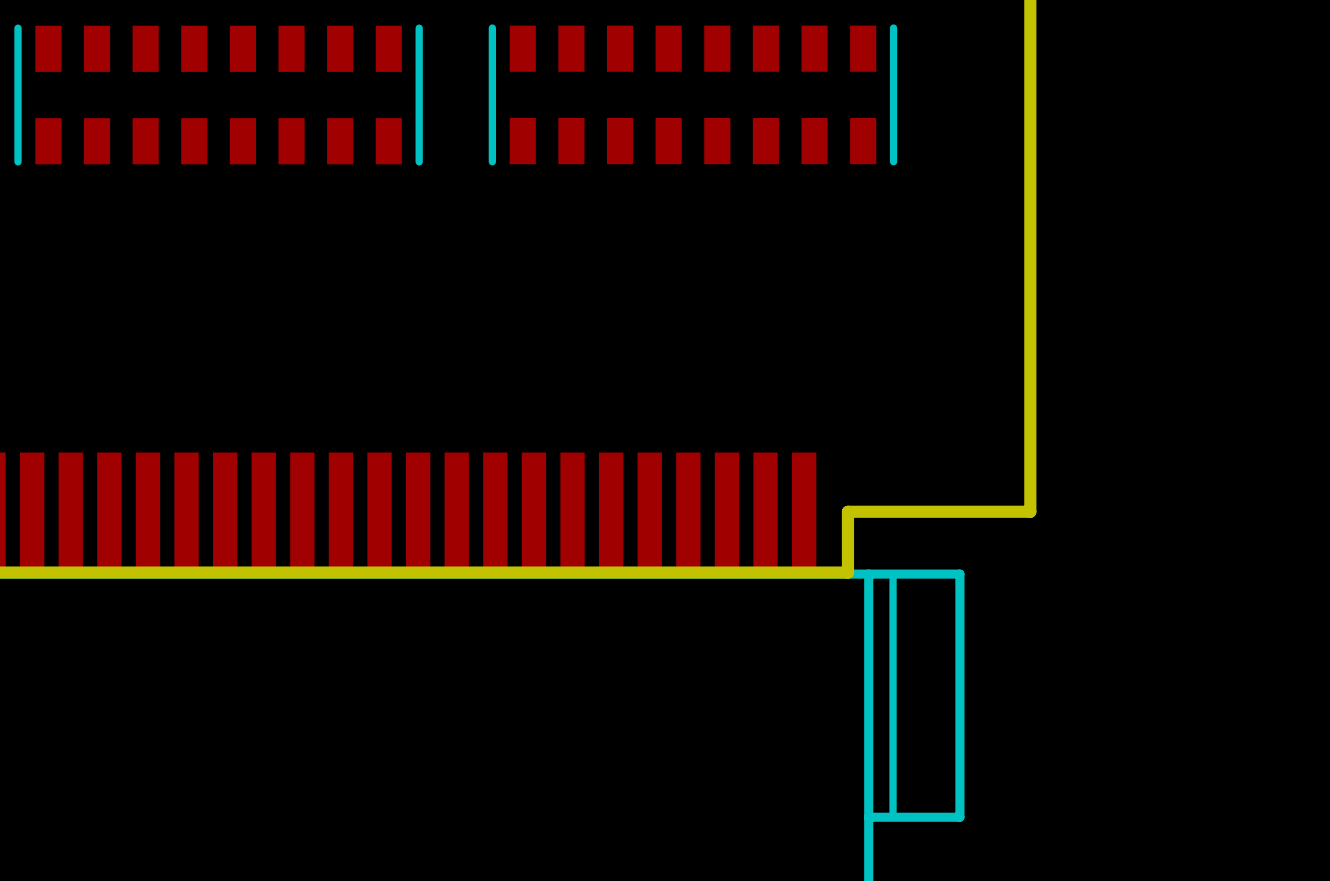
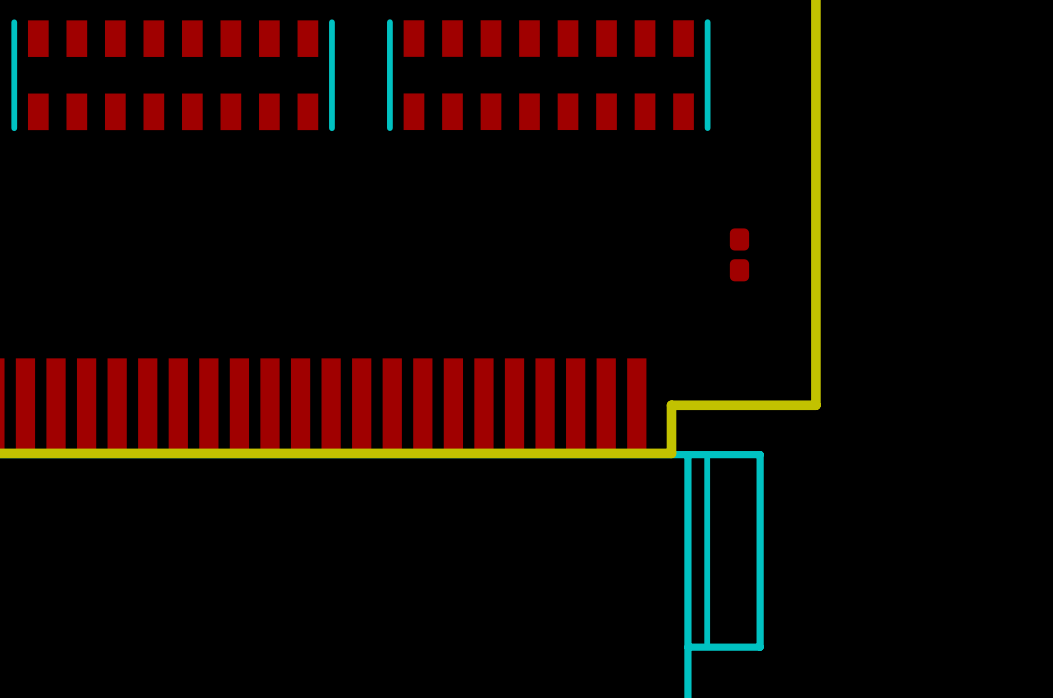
part: none -> (739, 254)

